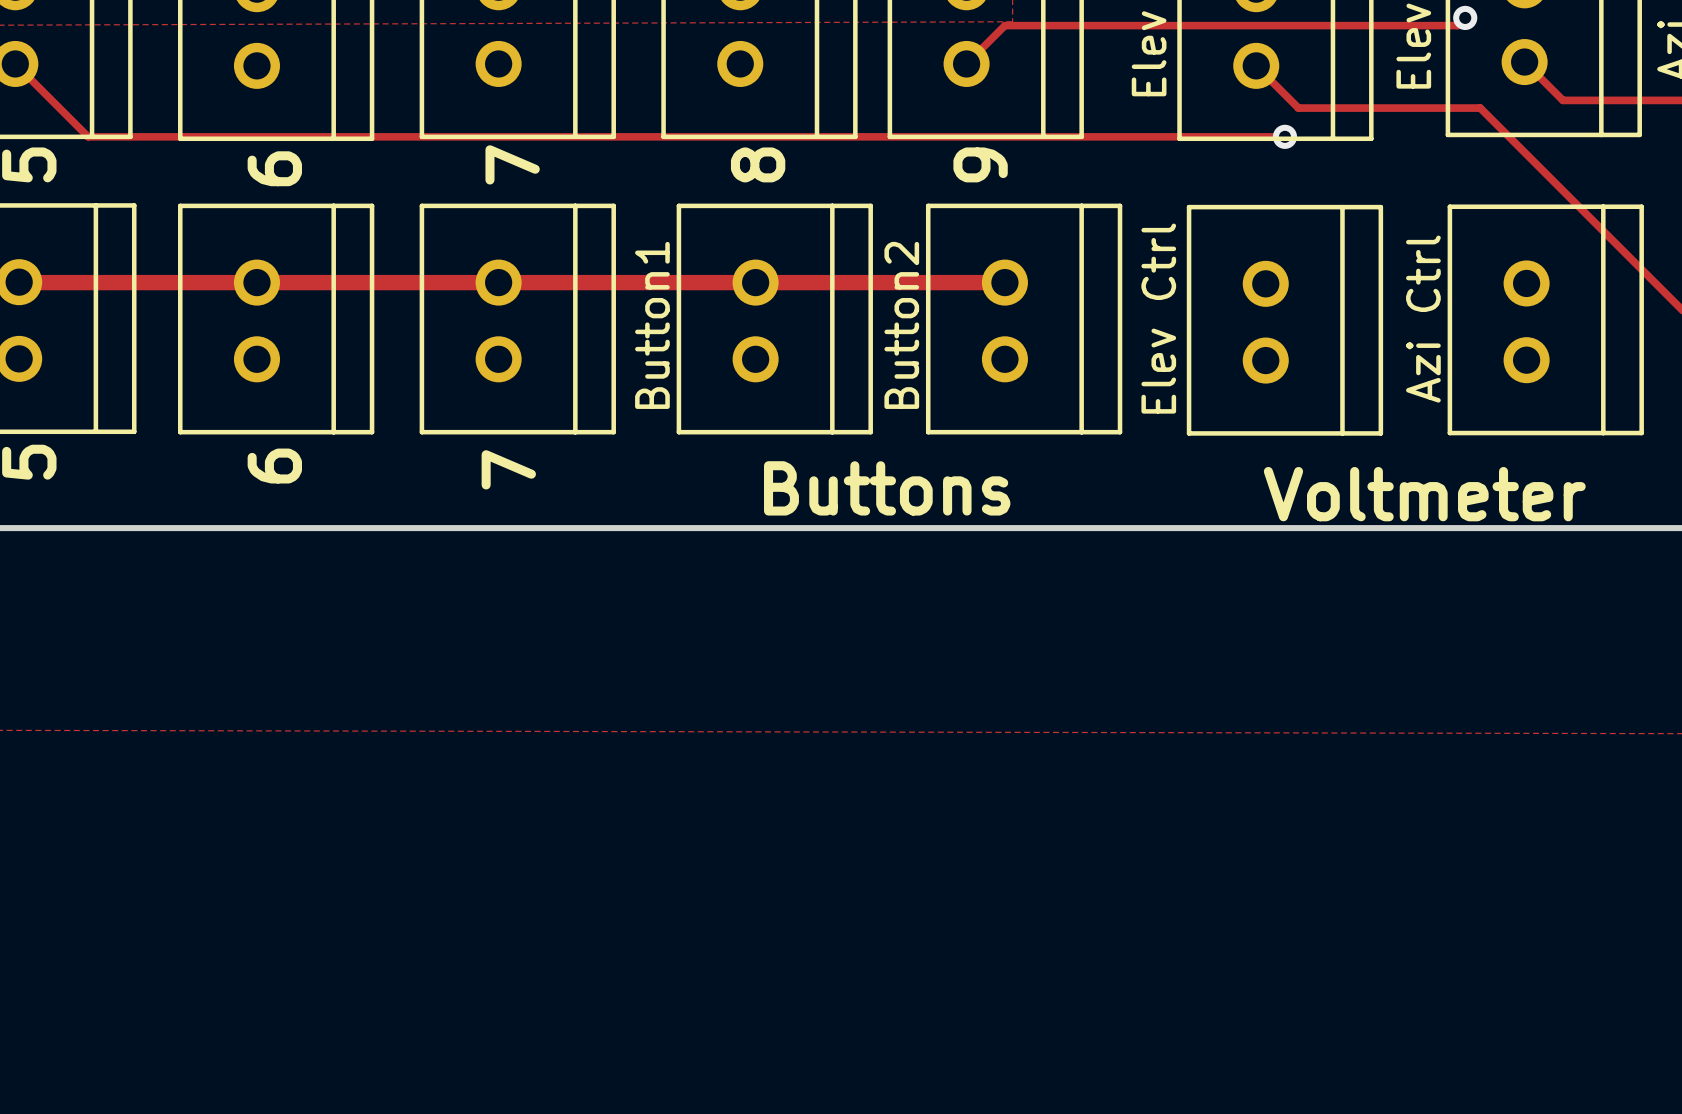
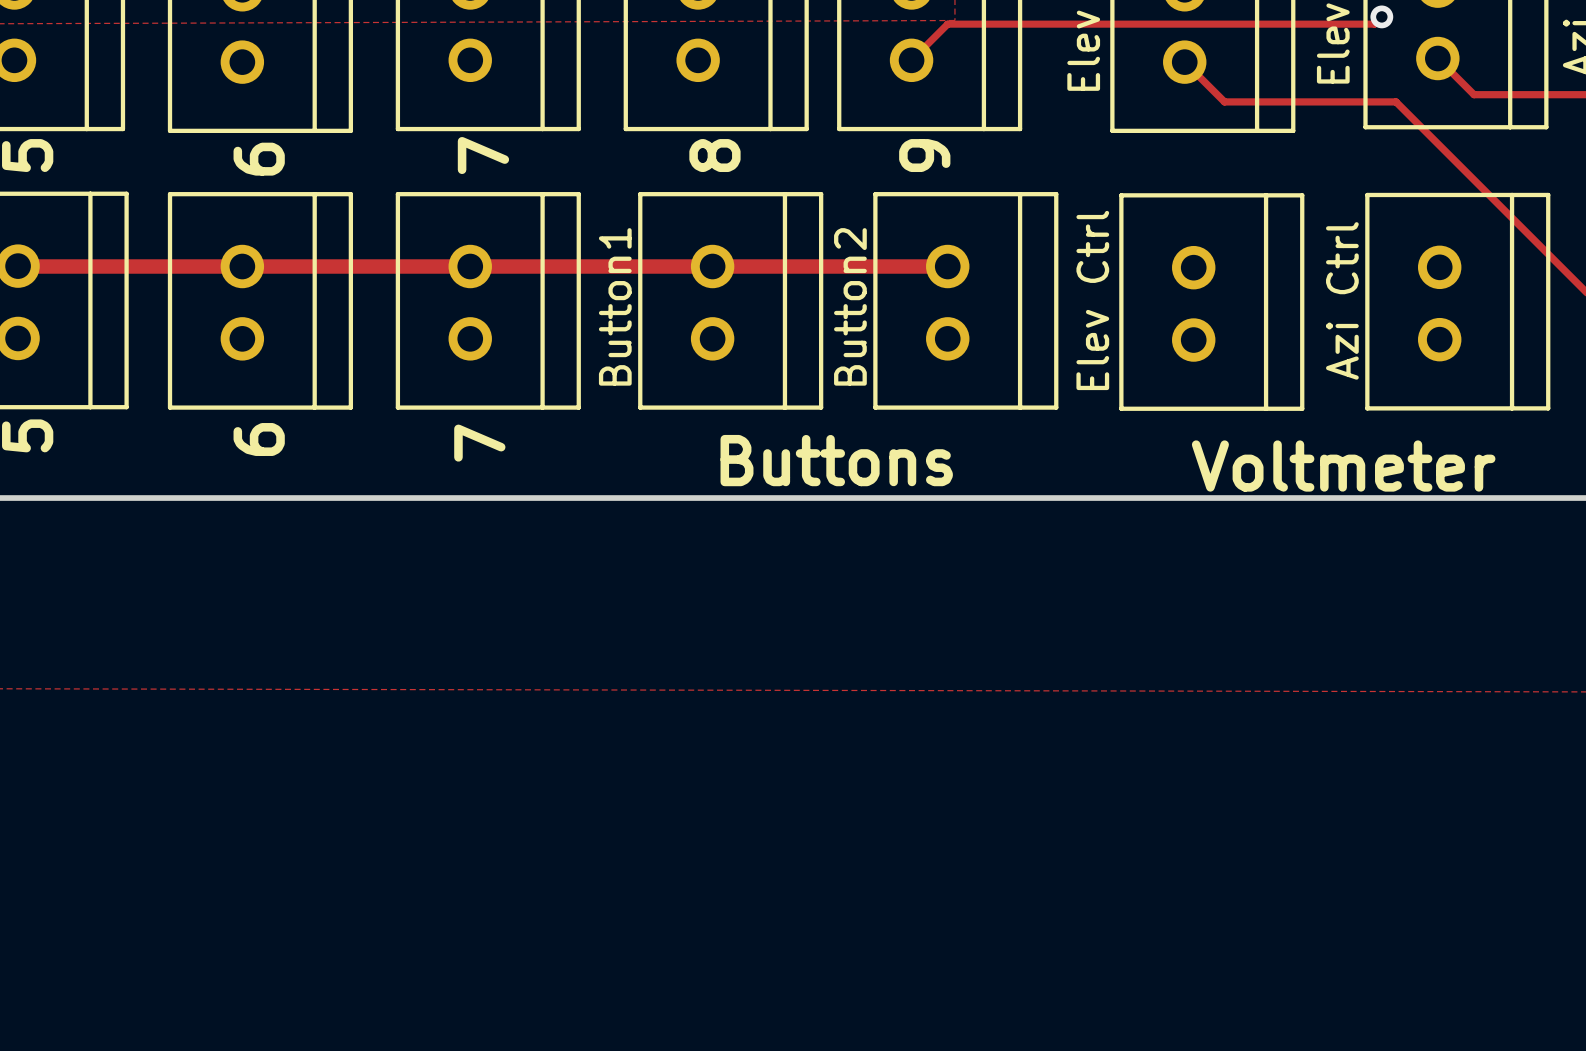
track: (15, 63) (88, 136) (1284, 136) -> none
via: (1284, 136) -> none

